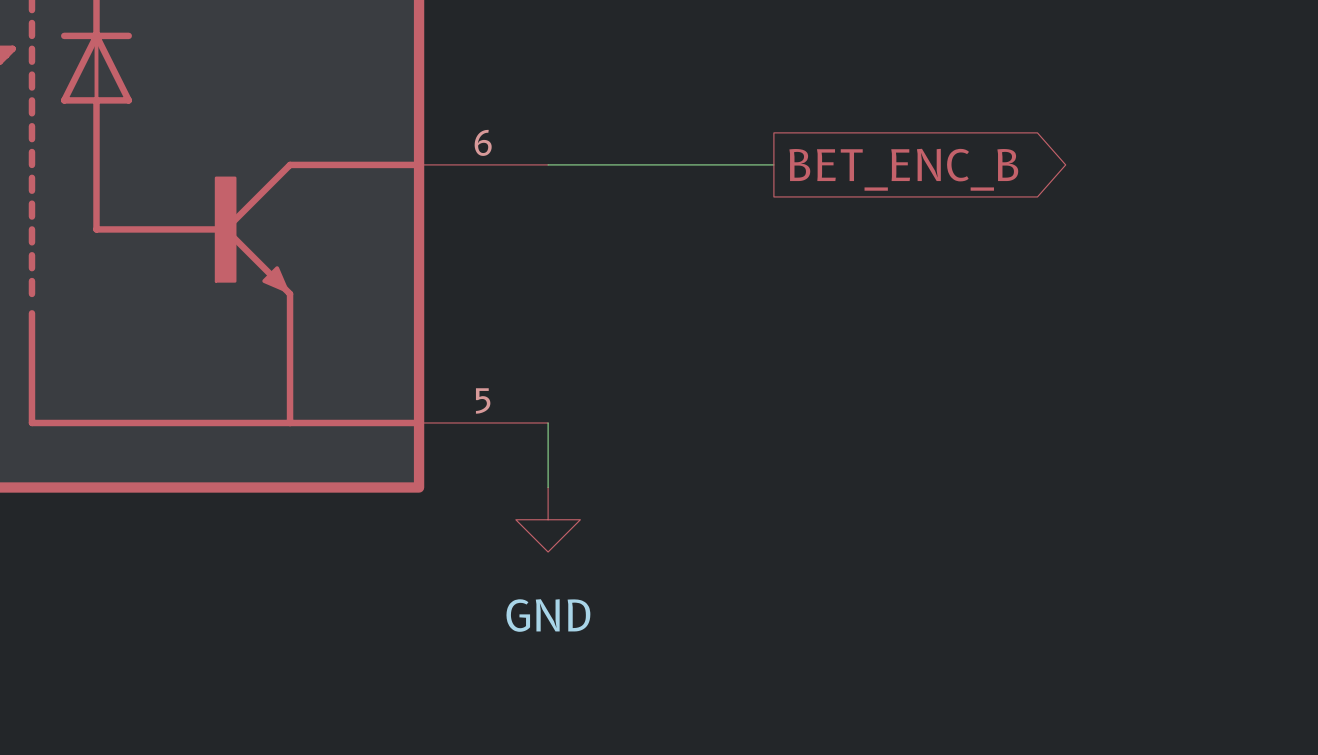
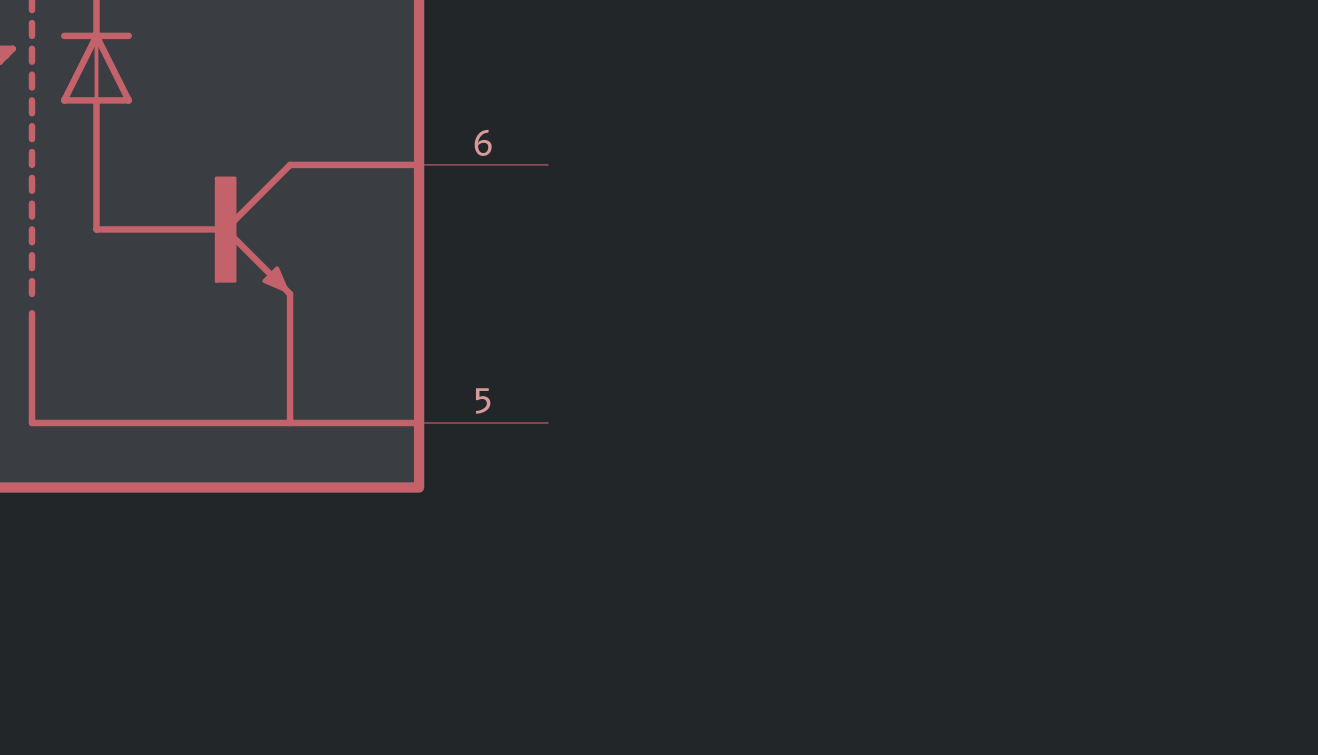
wire: (548, 164) (773, 164) -> none
global label: BET_ENC_B (903, 169) -> none
wire: (548, 422) (548, 487) -> none
power symbol: GND (548, 519) -> none

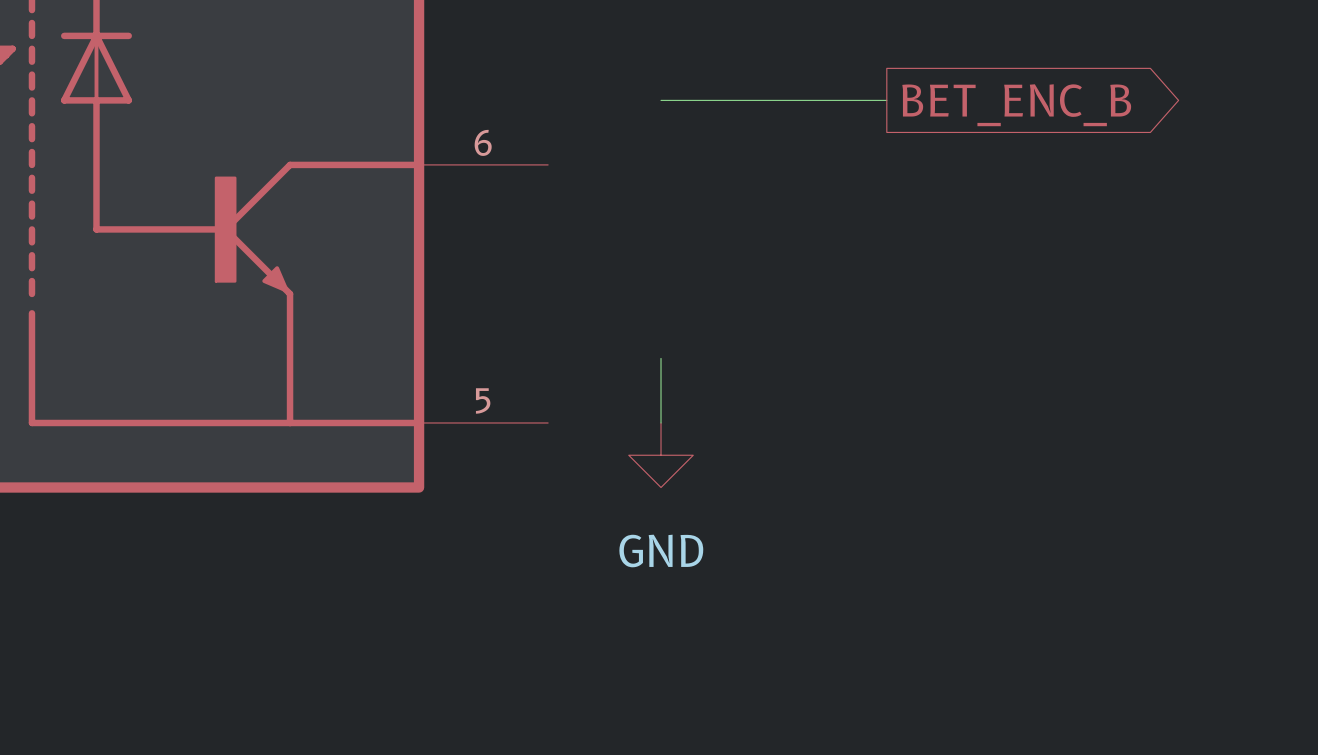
wire: none -> (661, 100) (886, 100)
global label: none -> BET_ENC_B (1016, 105)
wire: none -> (661, 358) (661, 422)
power symbol: none -> GND (661, 455)

